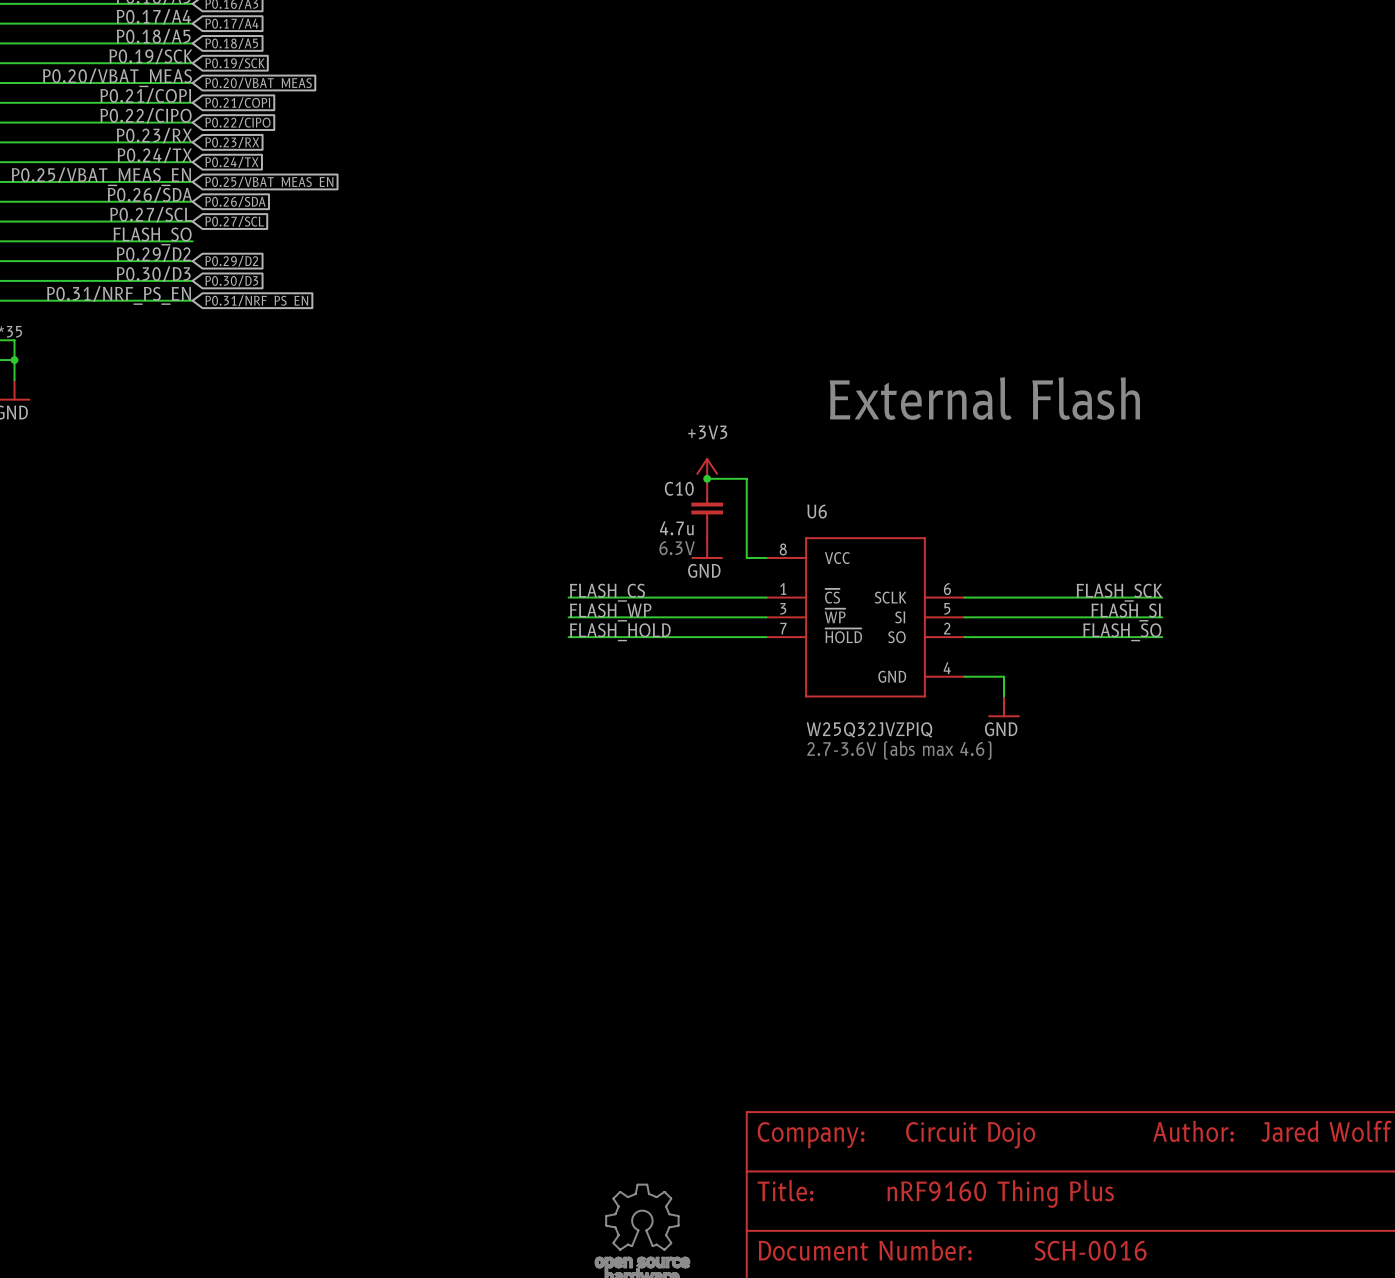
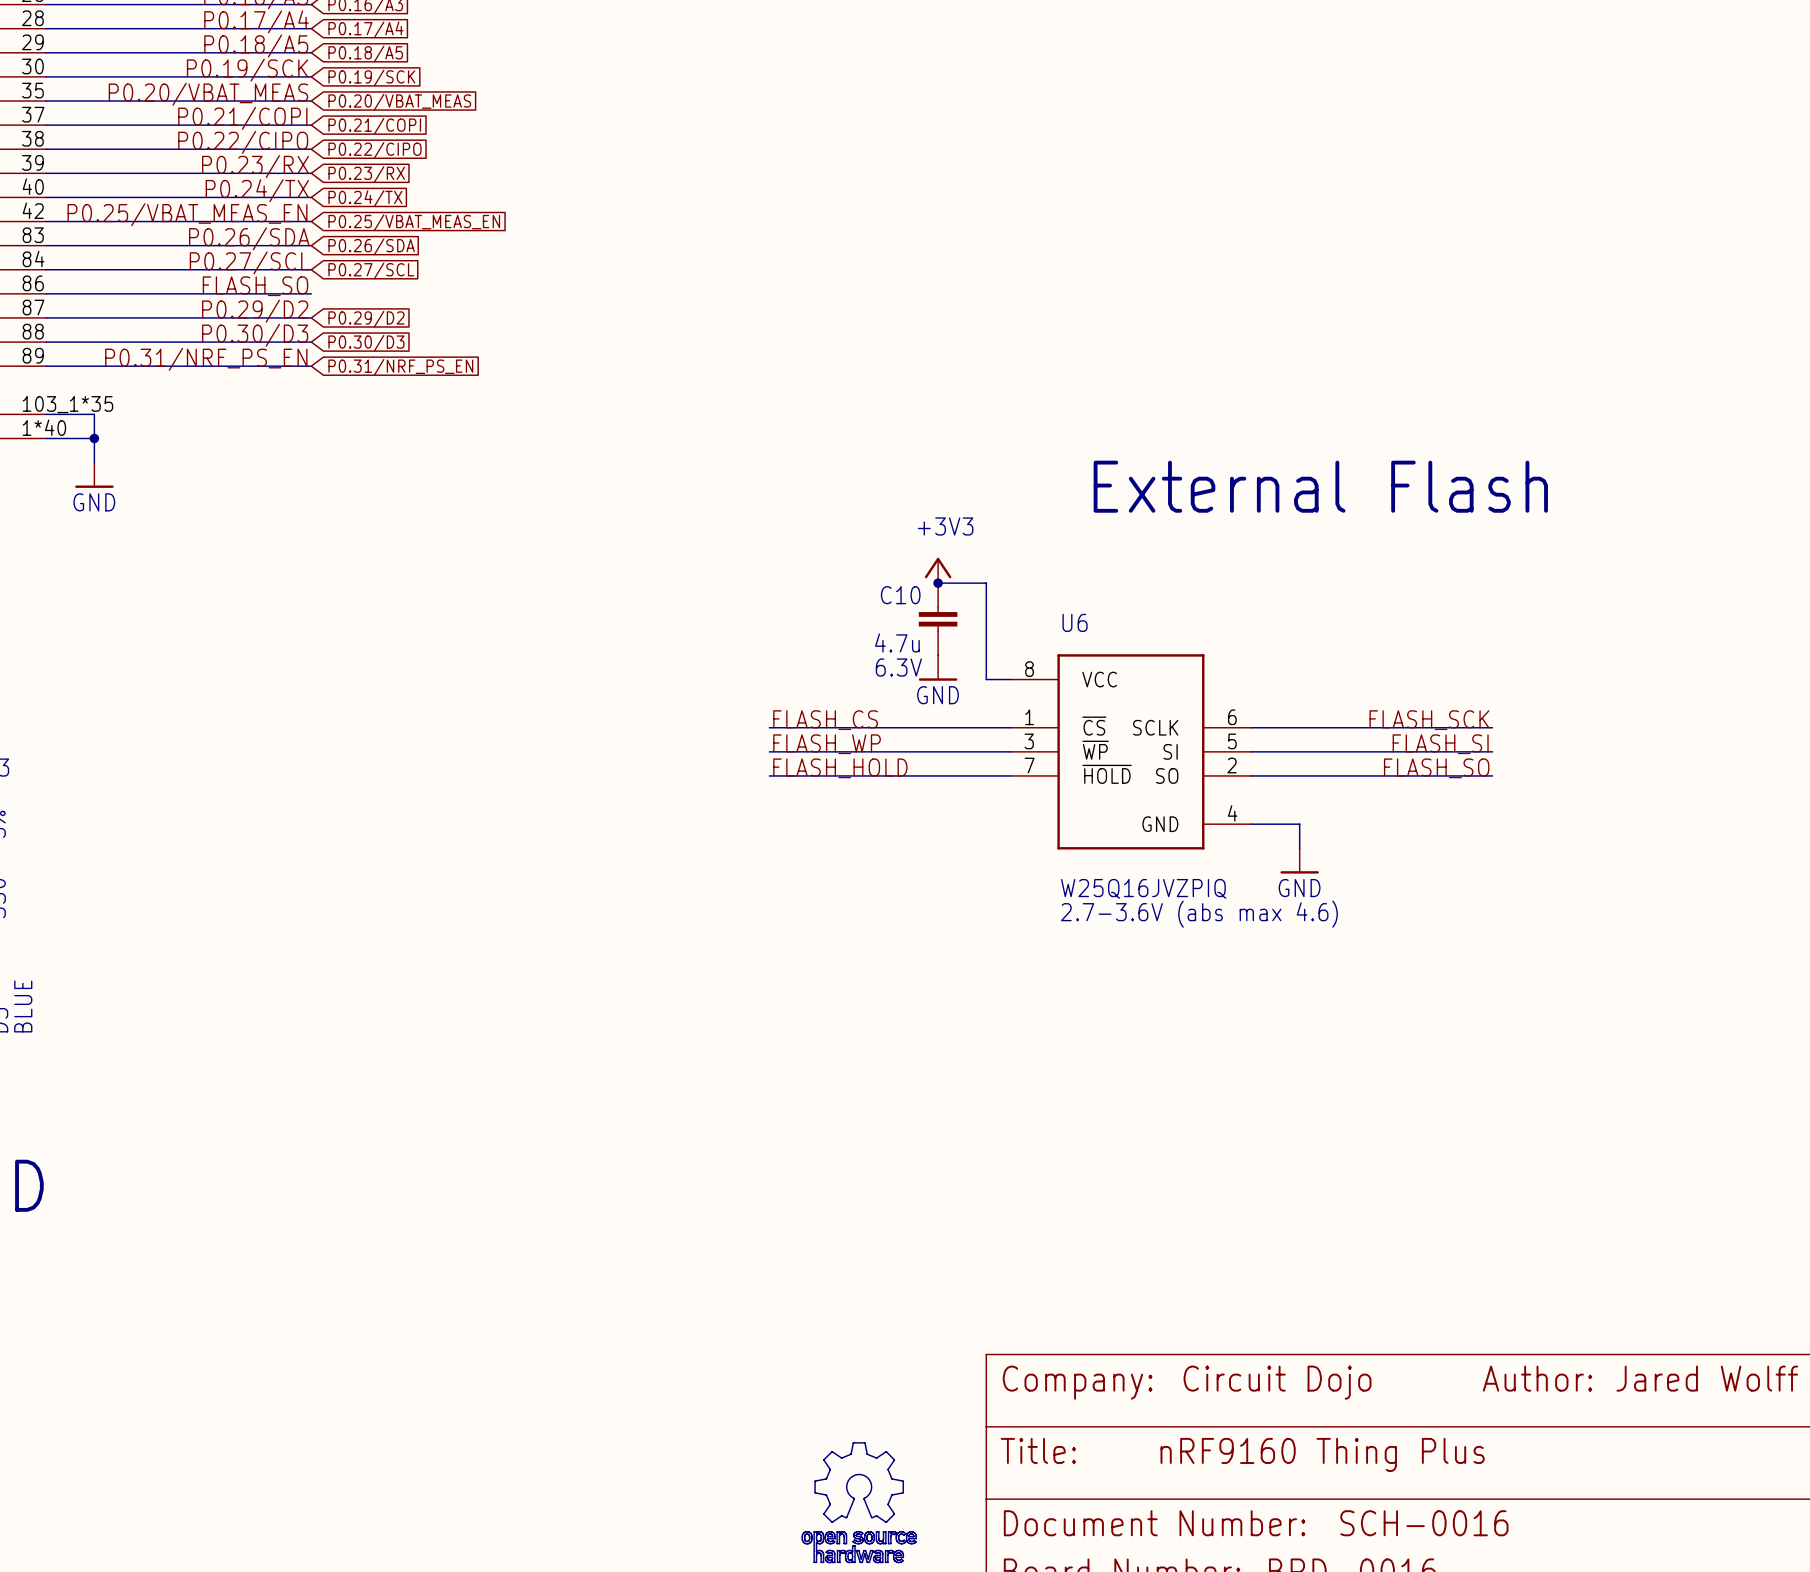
U6 text: W25Q32JVZPIQ (869, 729) -> W25Q16JVZPIQ (1143, 888)

